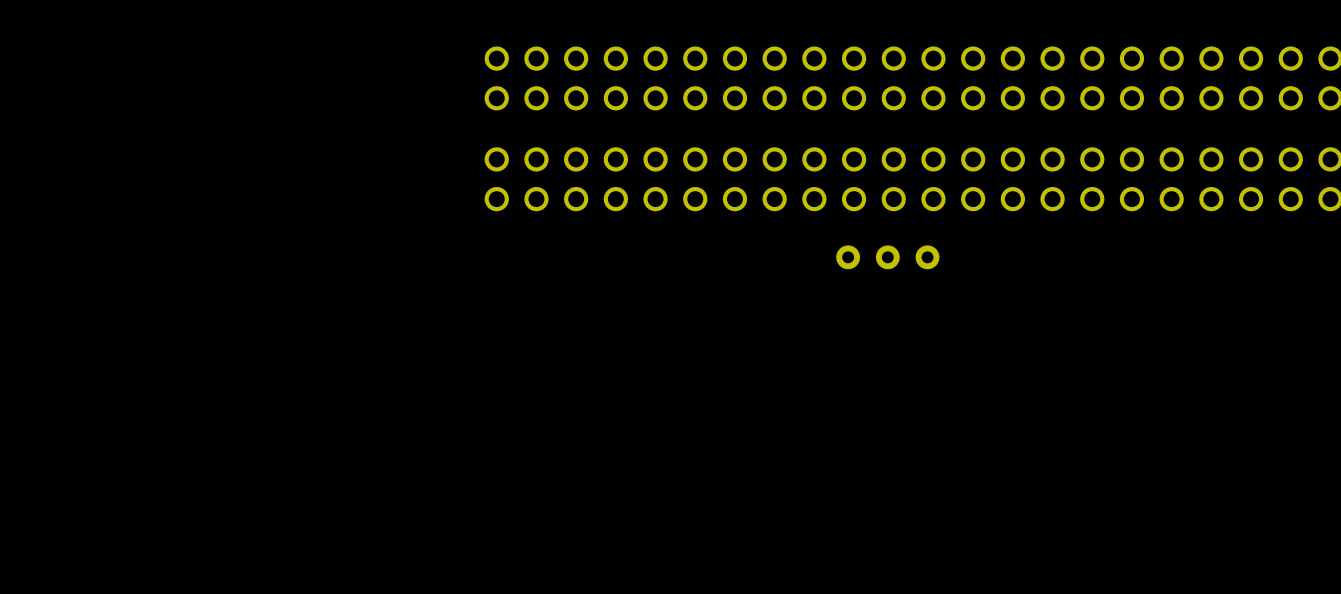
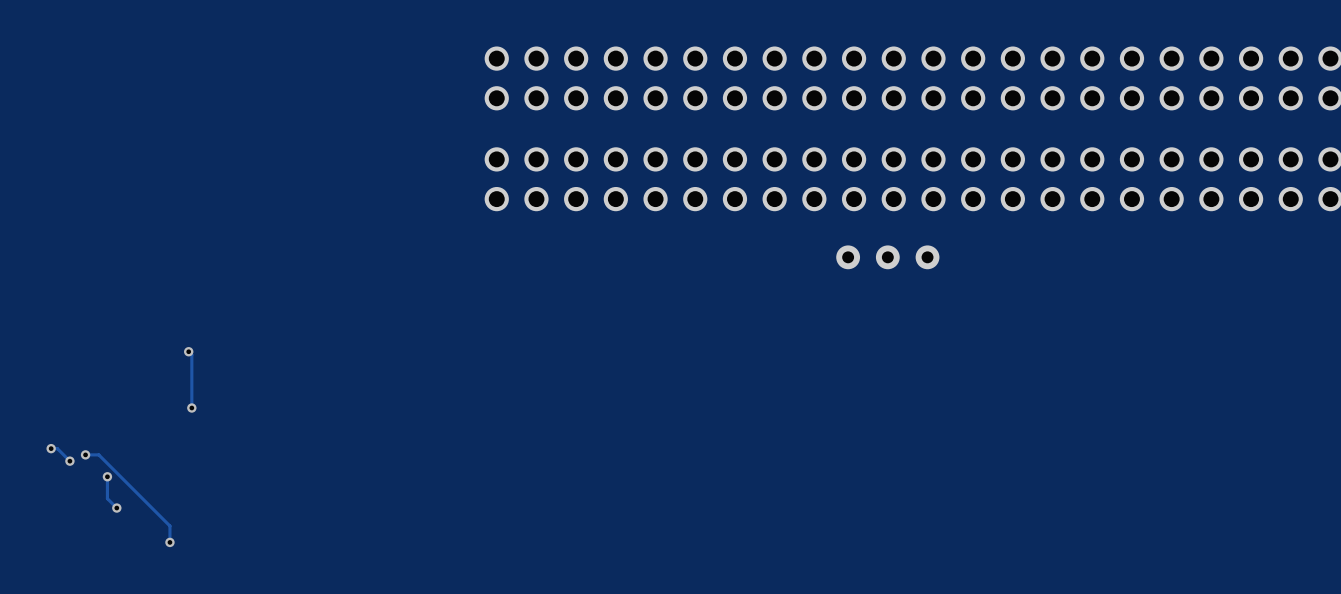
track: none -> (188, 351) (191, 354) (191, 408)
via: none -> (188, 351)
via: none -> (191, 408)
track: none -> (51, 448) (57, 448) (69, 461)
via: none -> (51, 448)
track: none -> (85, 454) (98, 454) (169, 526) (169, 542)
via: none -> (85, 454)
via: none -> (69, 461)
track: none -> (107, 476) (107, 498) (116, 508)
via: none -> (107, 476)
via: none -> (116, 508)
via: none -> (169, 542)

